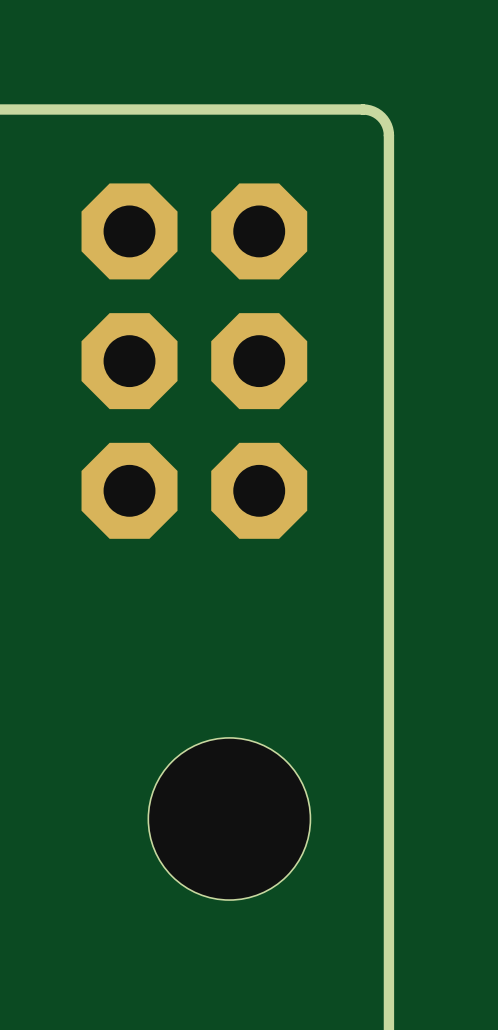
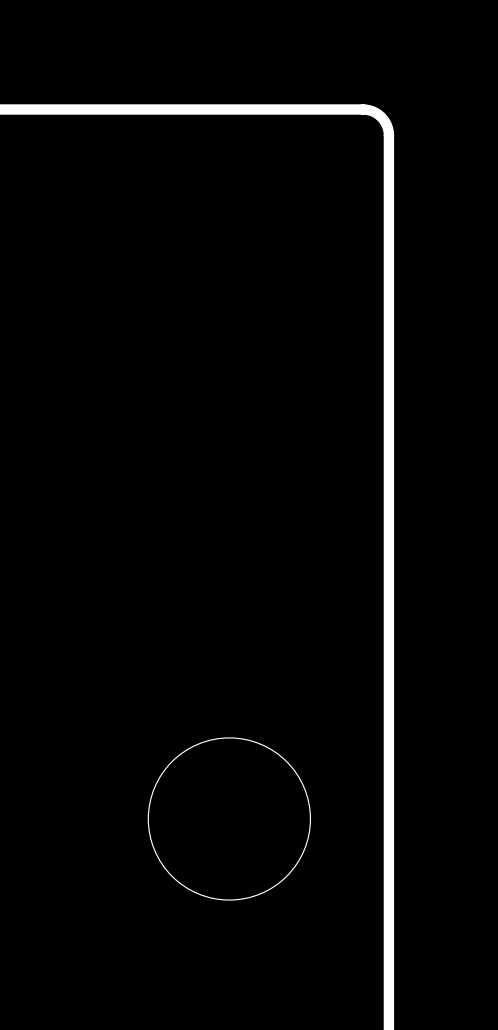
part: (194, 361) -> none

